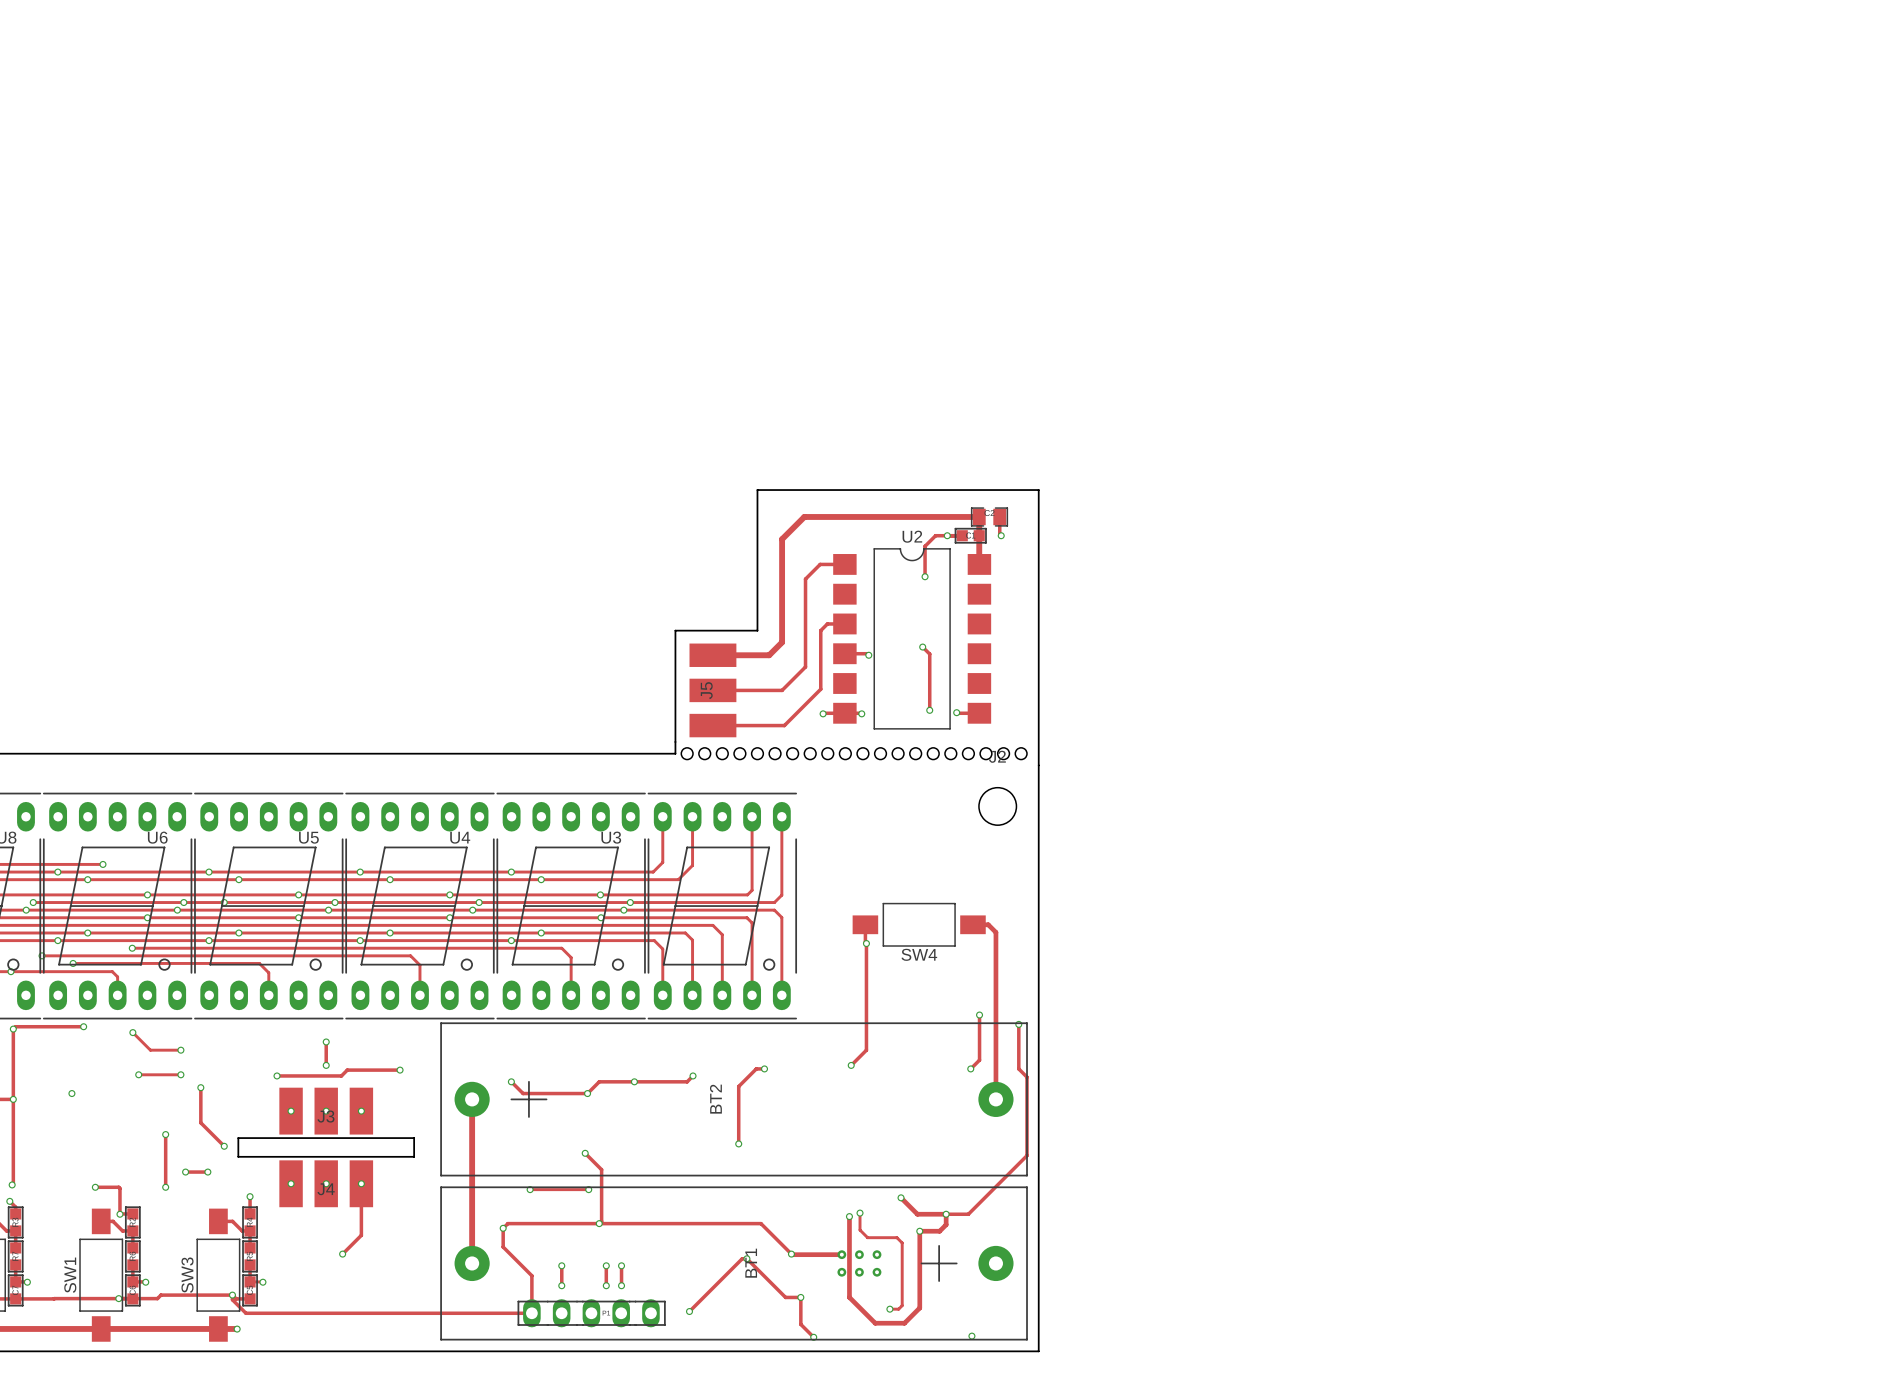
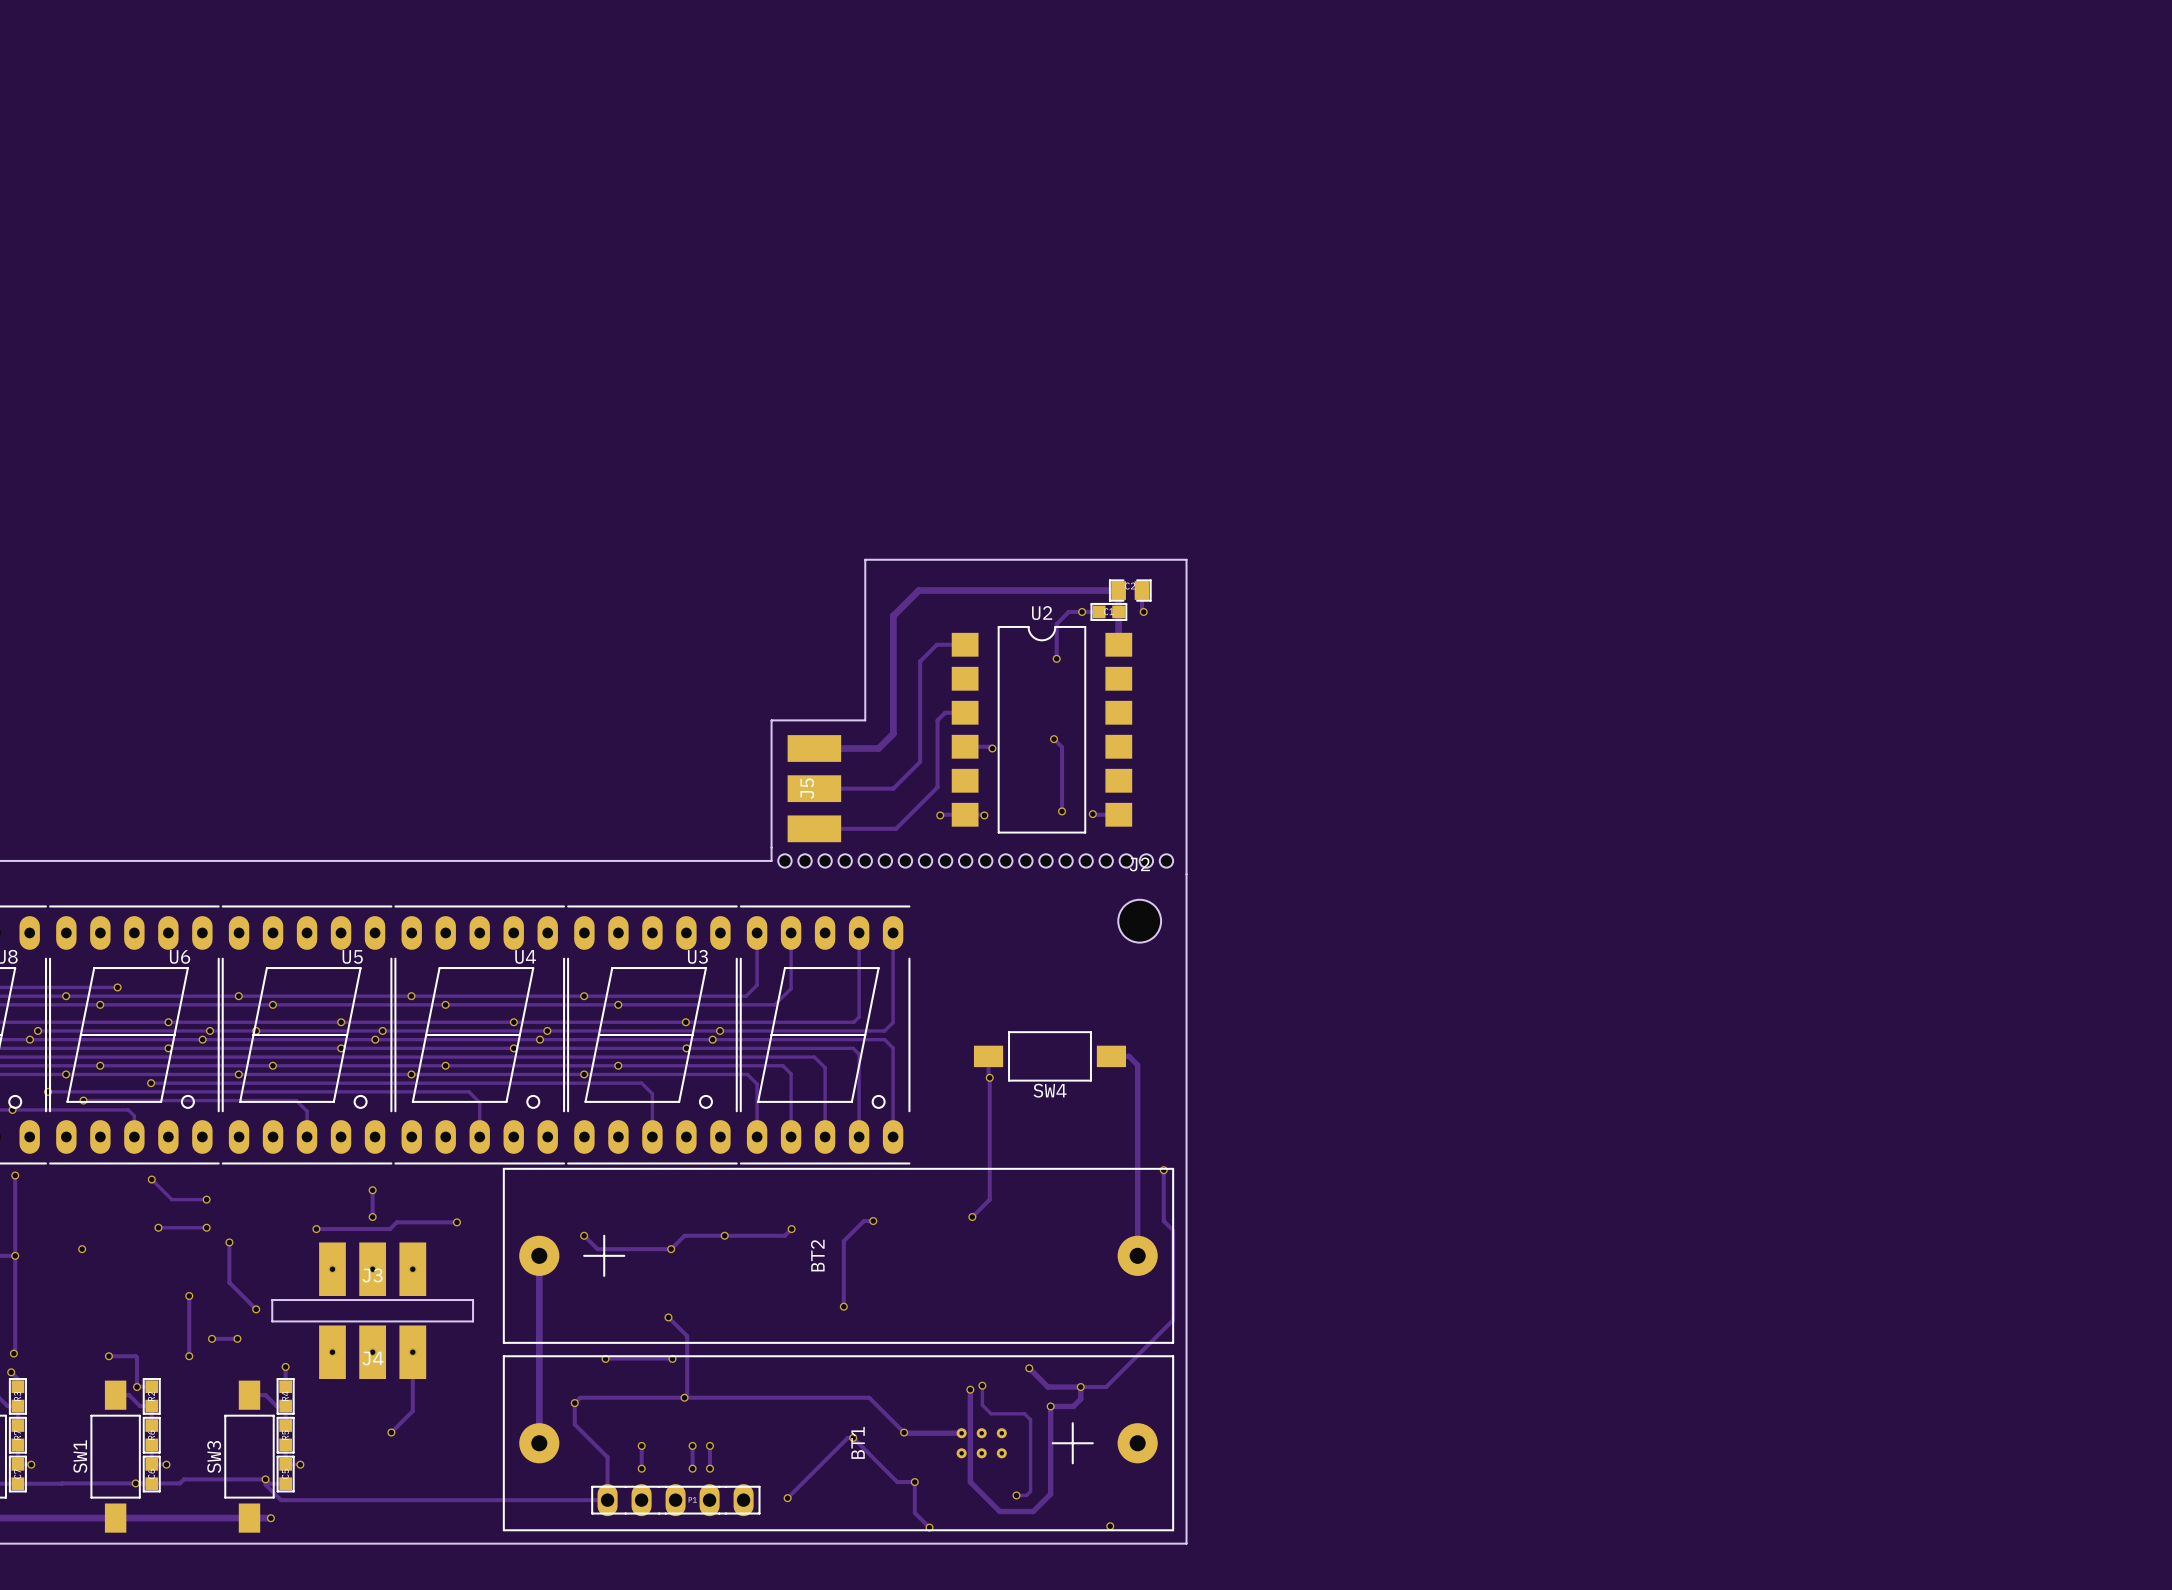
track: (979, 1015) (979, 1060) (970, 1068) -> none
via: (979, 1015) -> none
track: (83, 1026) (15, 1026) (13, 1029) -> none
via: (83, 1026) -> none
via: (970, 1068) -> none

